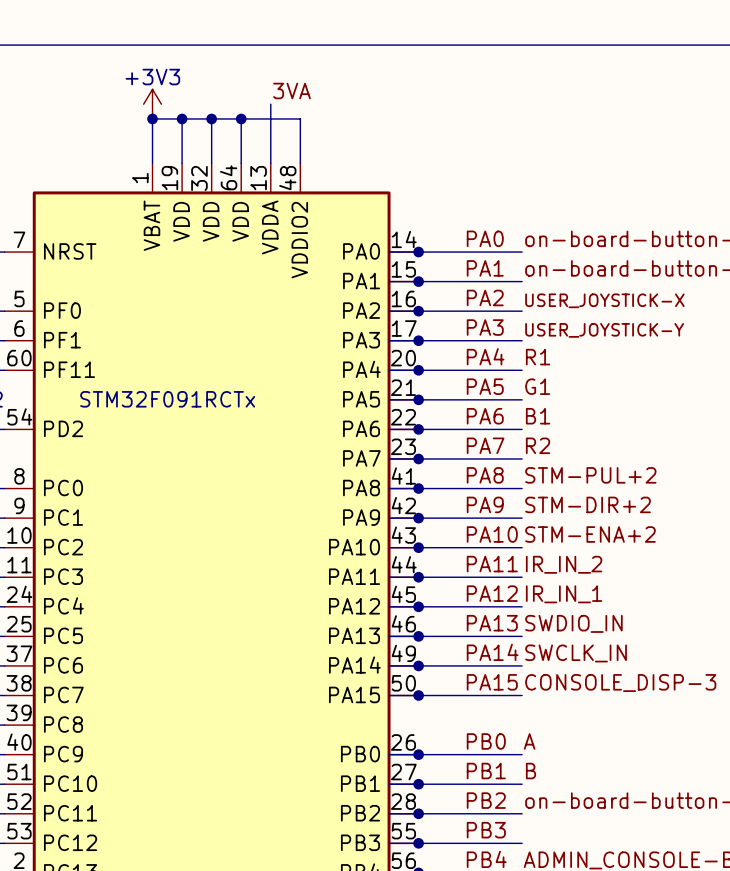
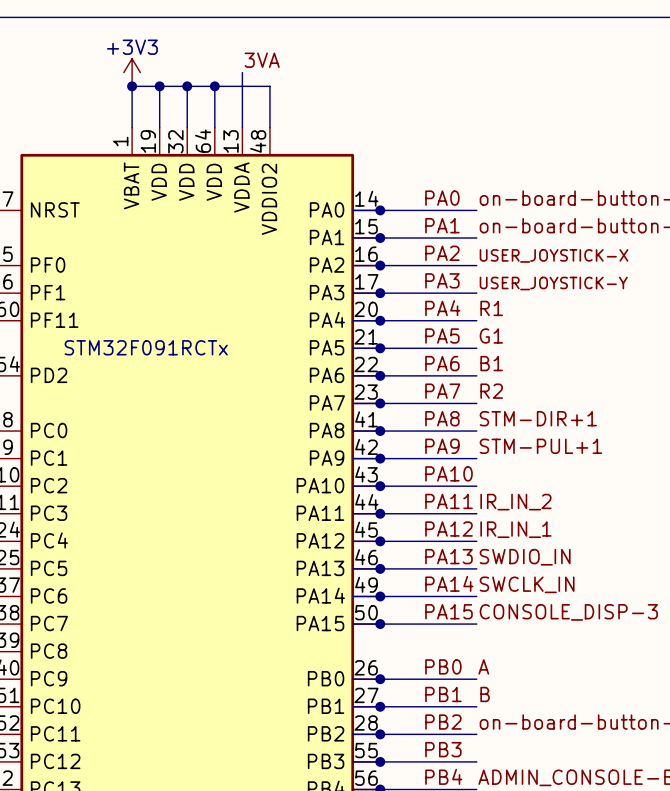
label: STM-PUL+2 (590, 475) -> STM-DIR+1 (538, 418)
label: STM-DIR+2 (588, 504) -> STM-PUL+1 (540, 446)
label: STM-ENA+2 (590, 534) -> none

